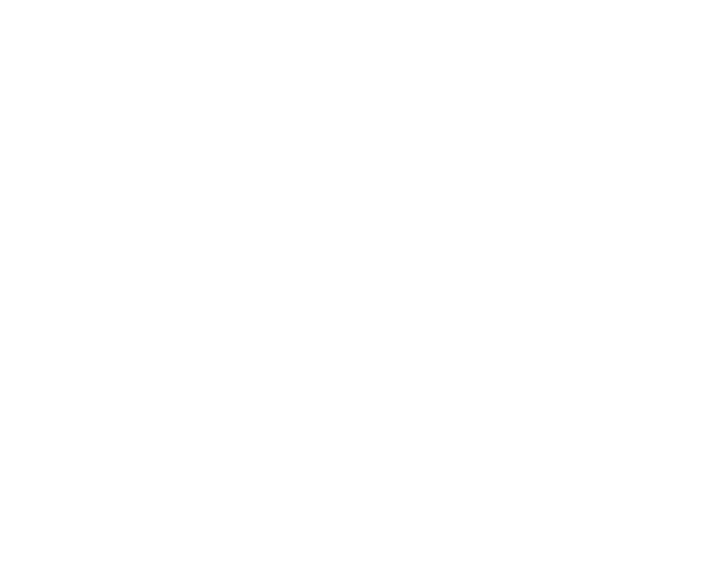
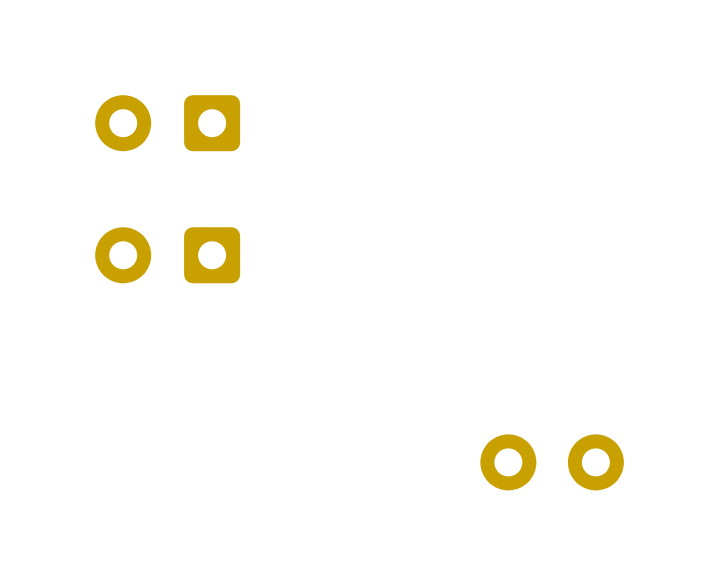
part: none -> (167, 123)
part: none -> (167, 255)
part: none -> (552, 462)

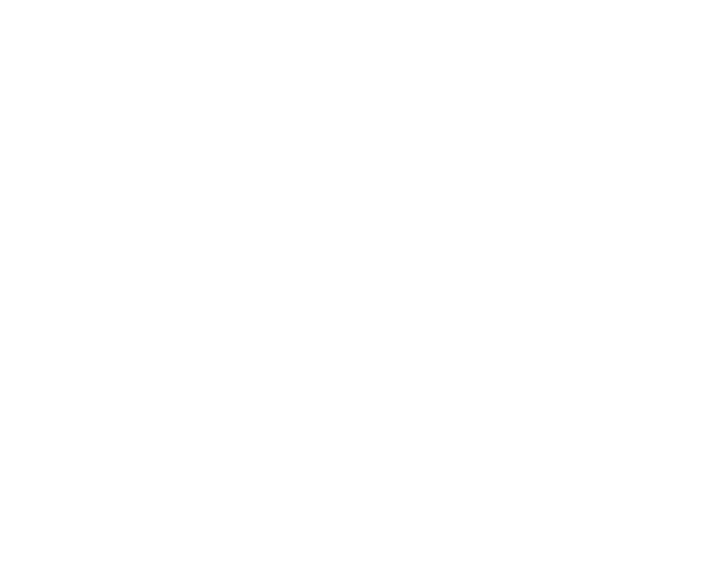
part: (167, 123) -> none
part: (167, 255) -> none
part: (552, 462) -> none

